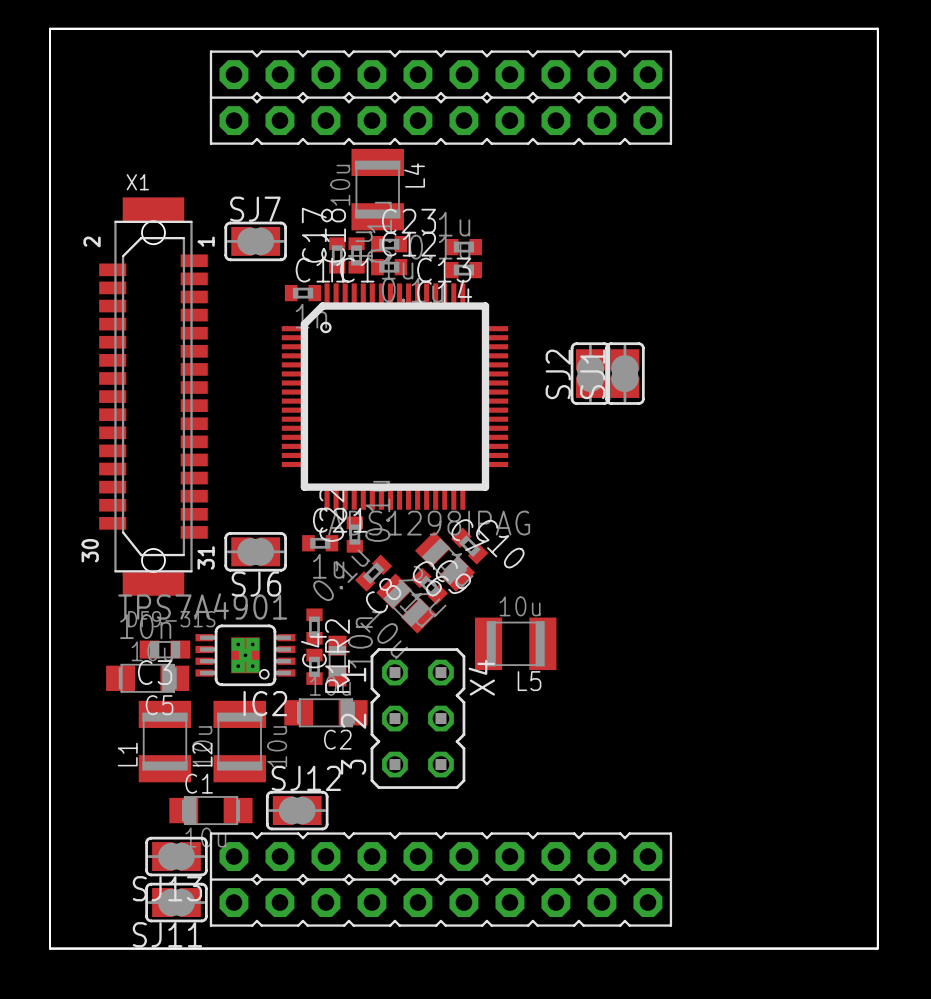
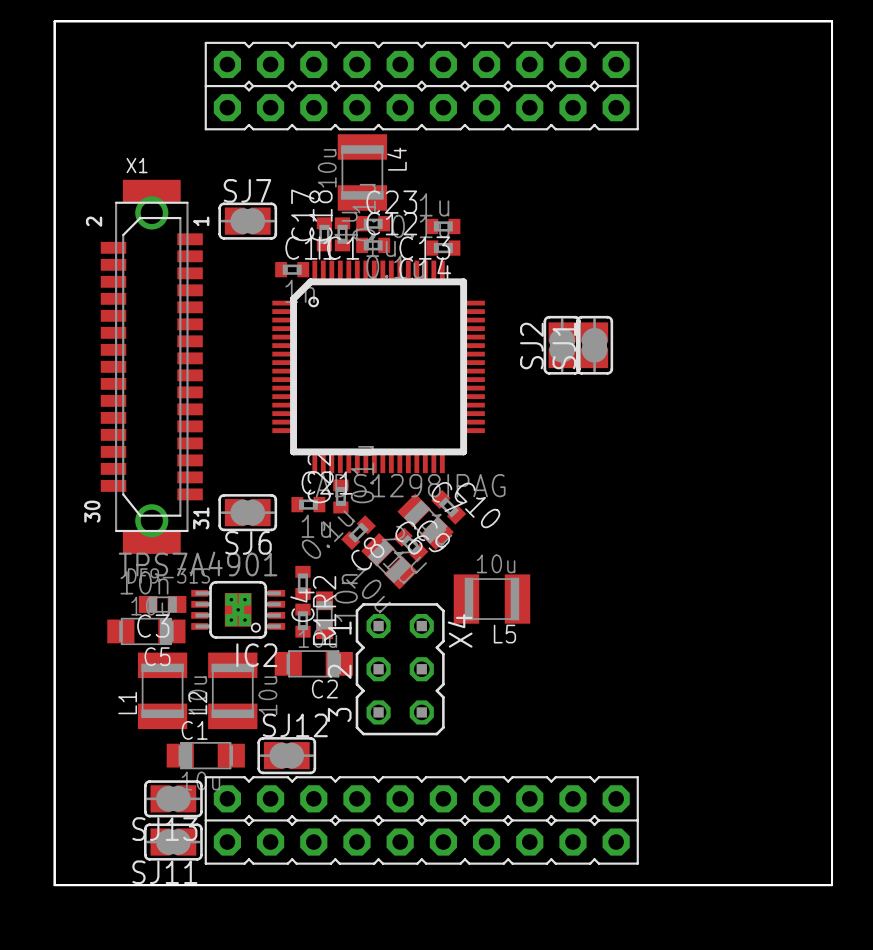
X1 footprint: [99, 197, 208, 596] -> [100, 179, 203, 554]

